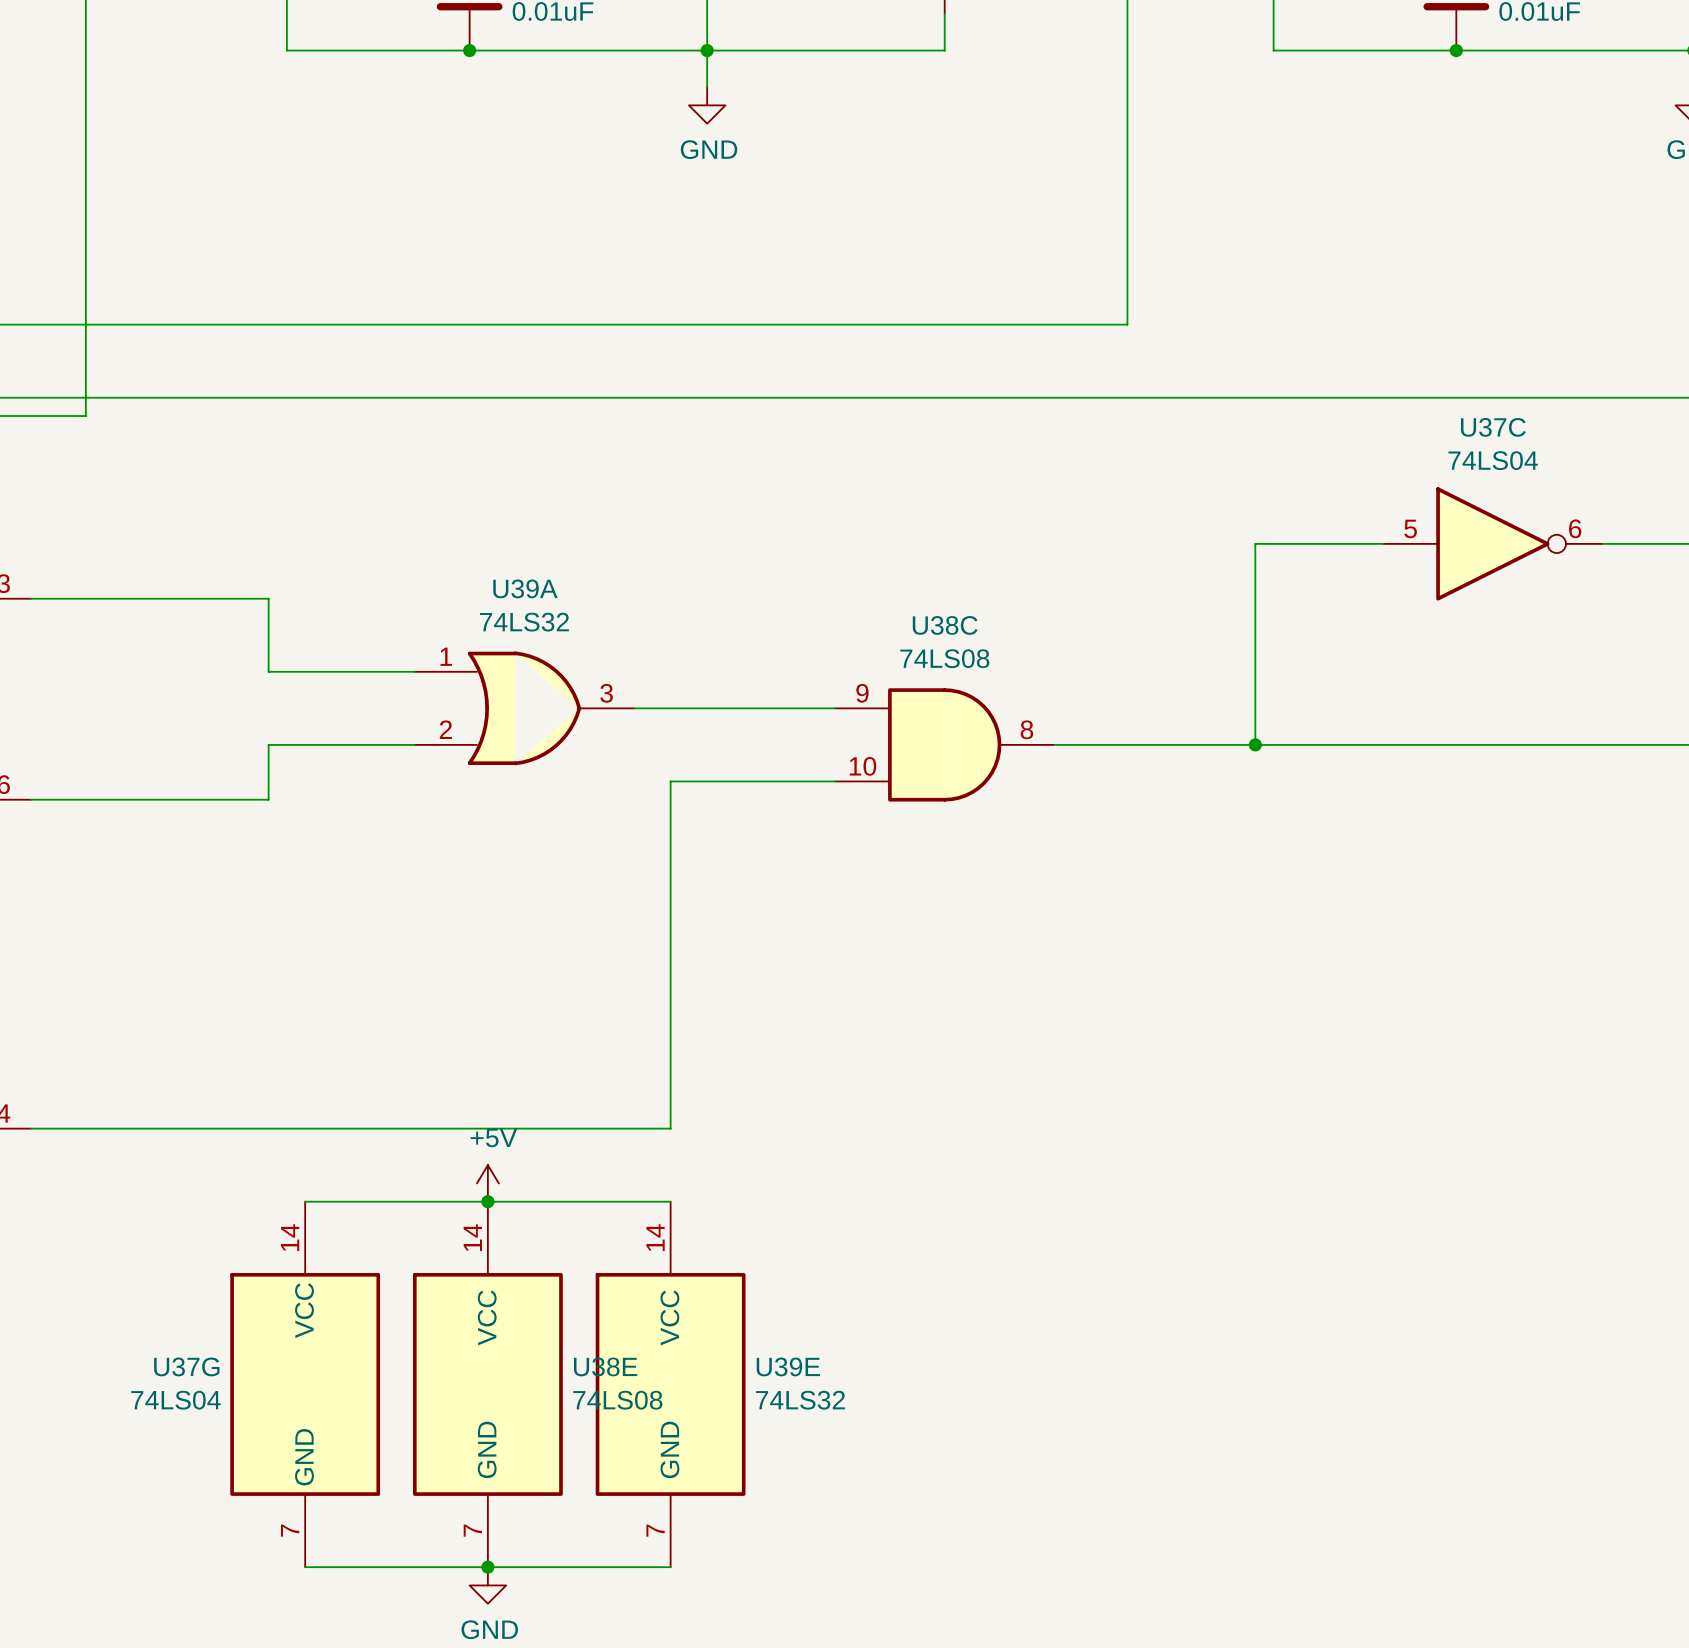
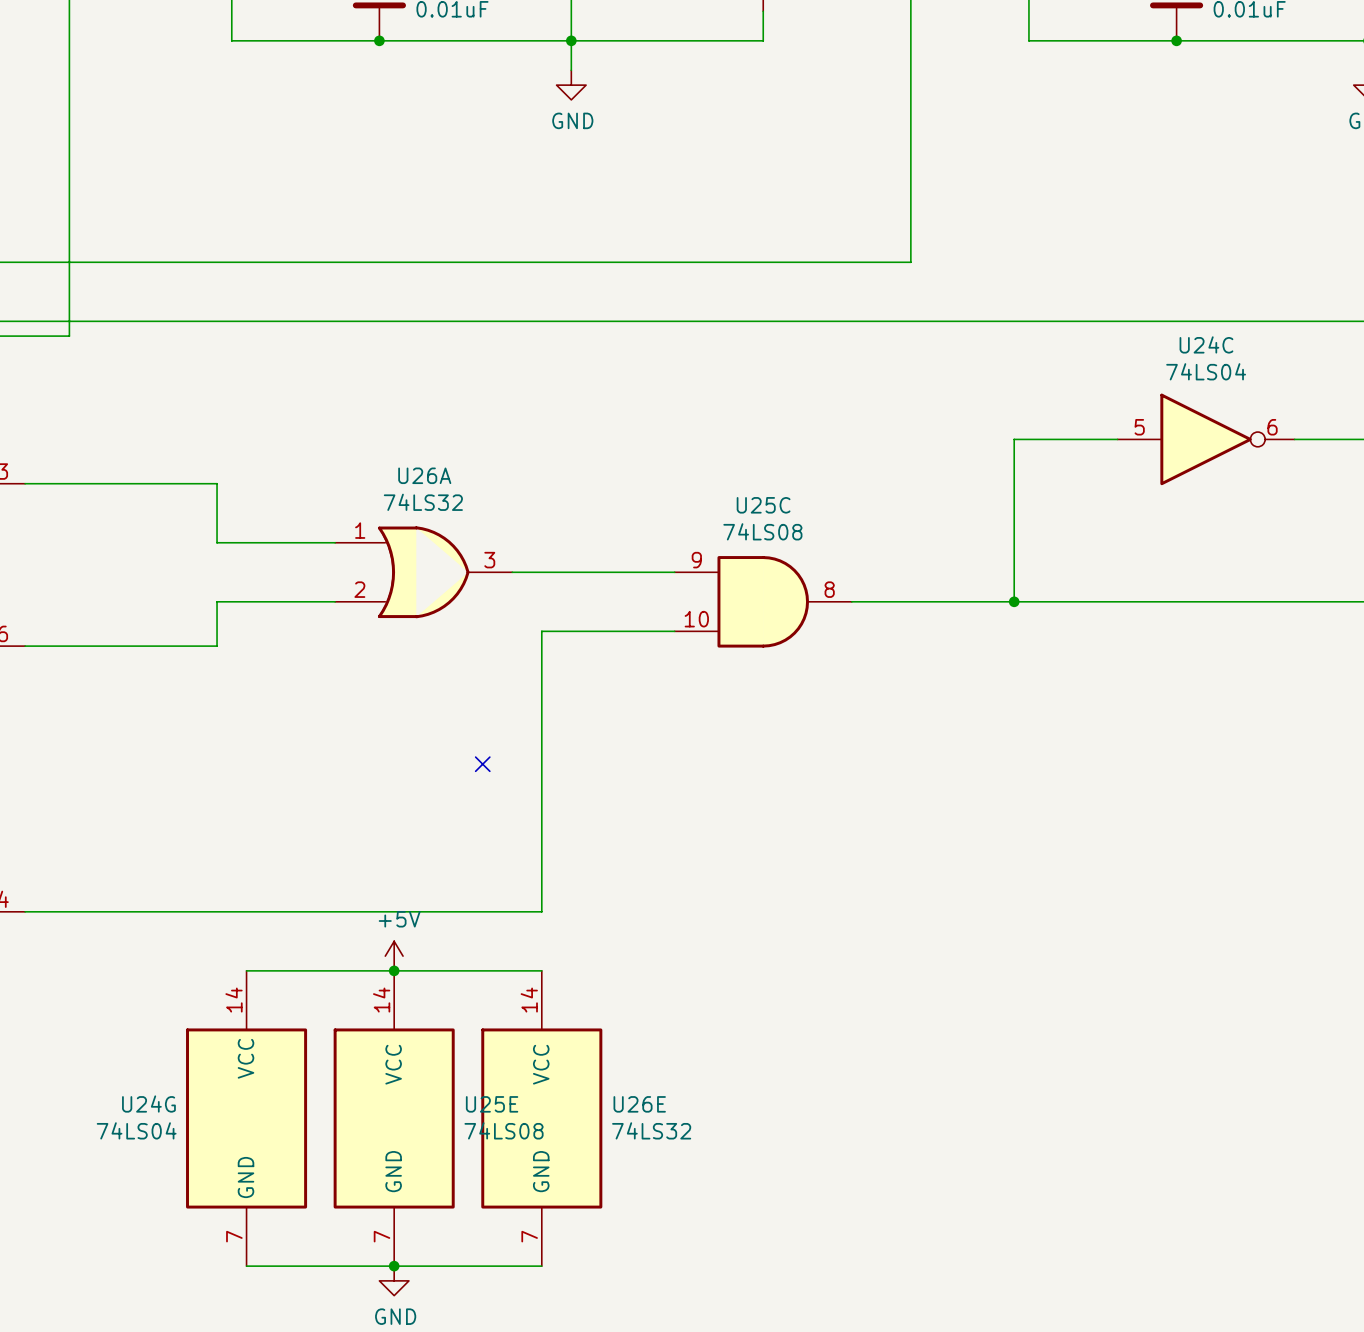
U37C name: U37C (1493, 427) -> U24C (1206, 344)
U39A name: U39A (525, 588) -> U26A (424, 475)
U38C name: U38C (945, 625) -> U25C (763, 505)
no-connect mark: none -> (482, 764)
U37G name: U37G (186, 1366) -> U24G (148, 1104)
U38E name: U38E (605, 1366) -> U25E (492, 1104)
U39E name: U39E (788, 1366) -> U26E (639, 1104)

